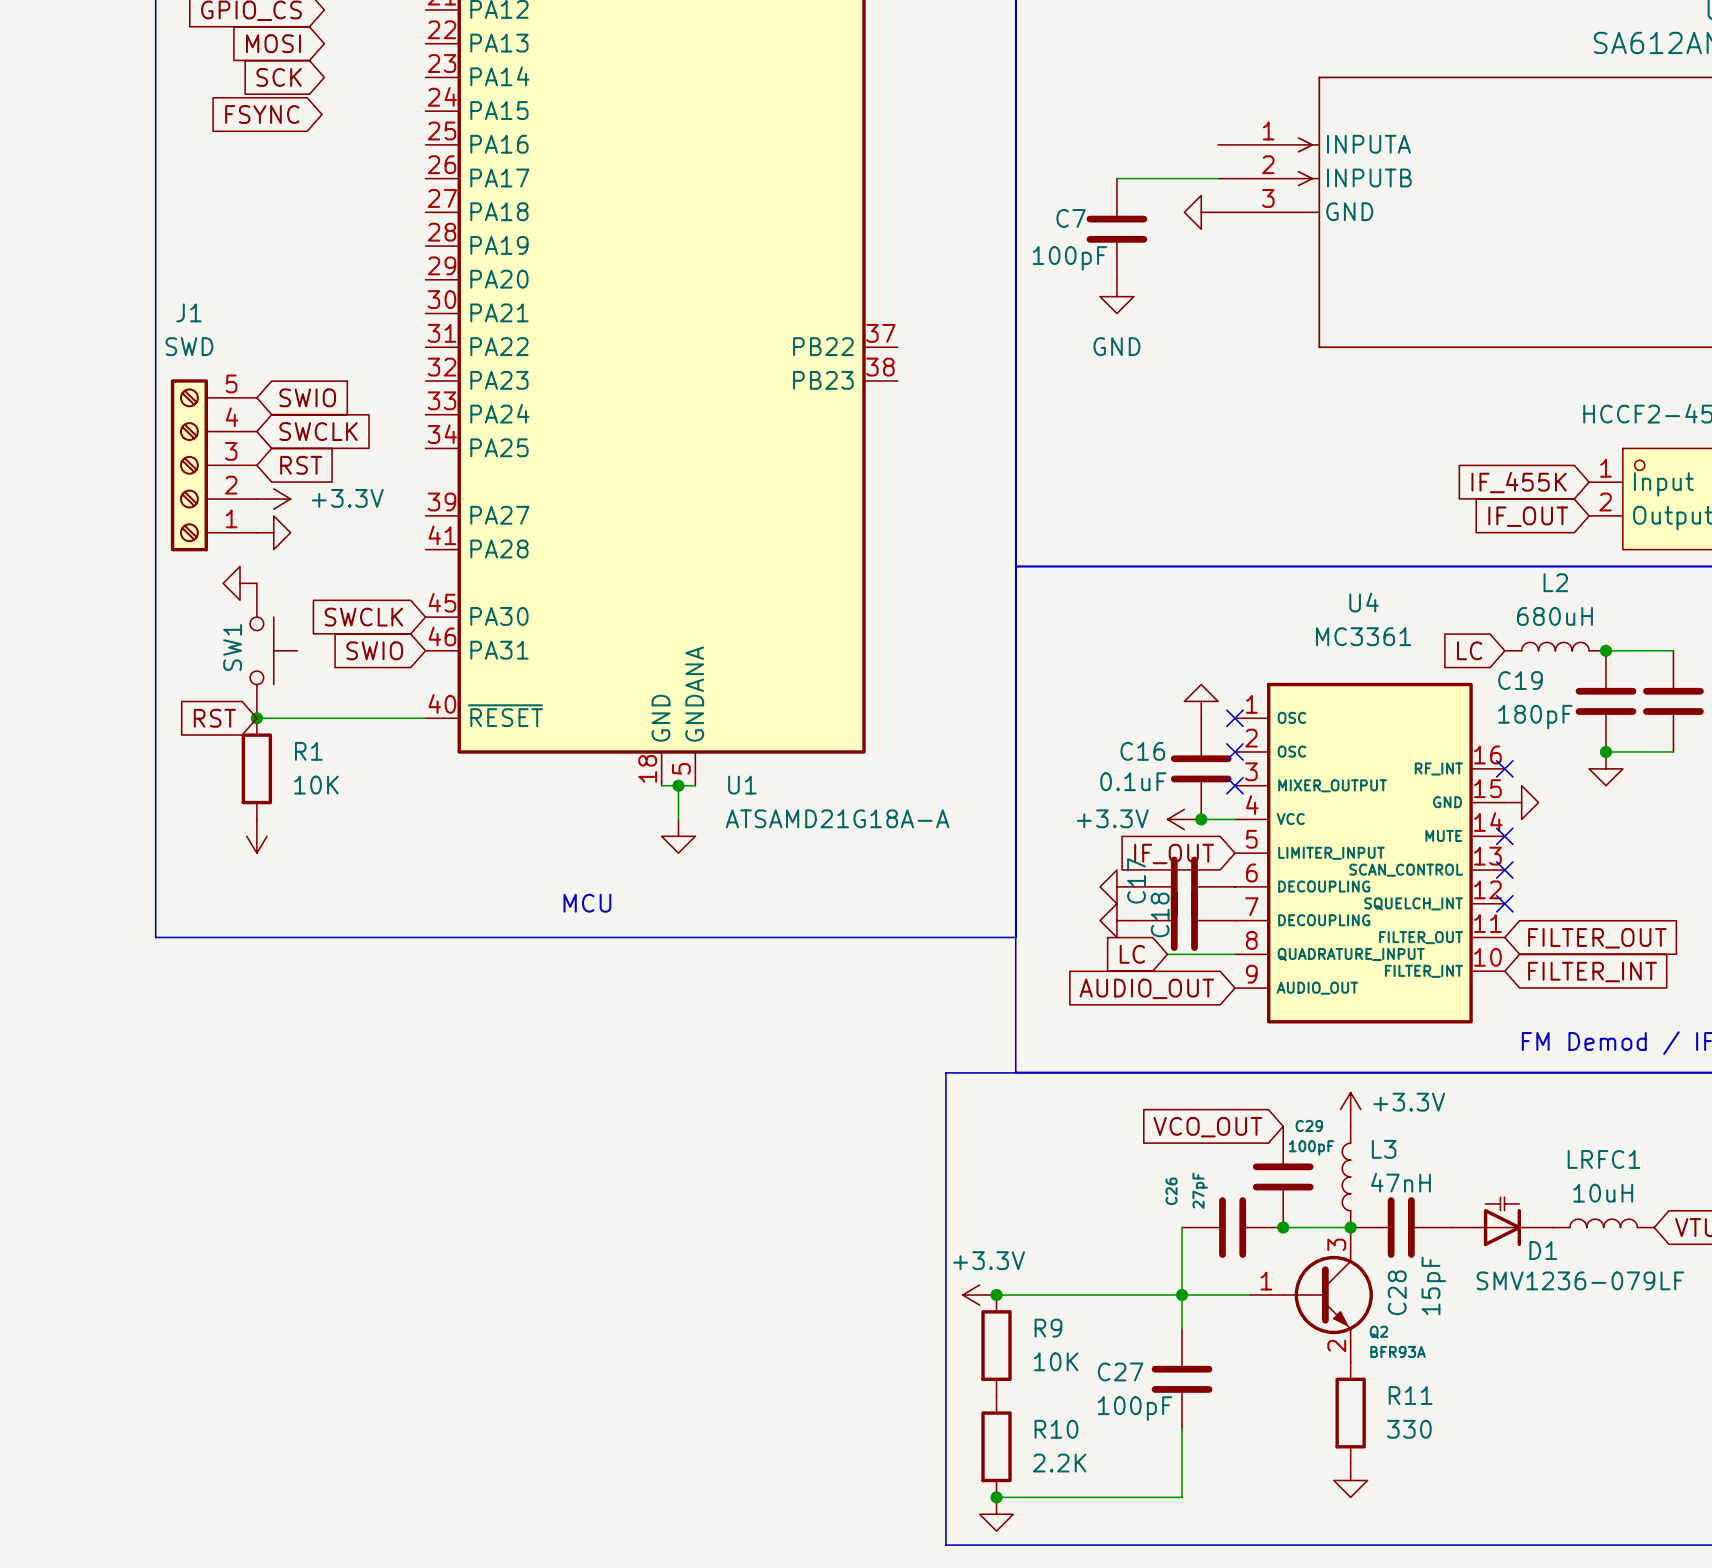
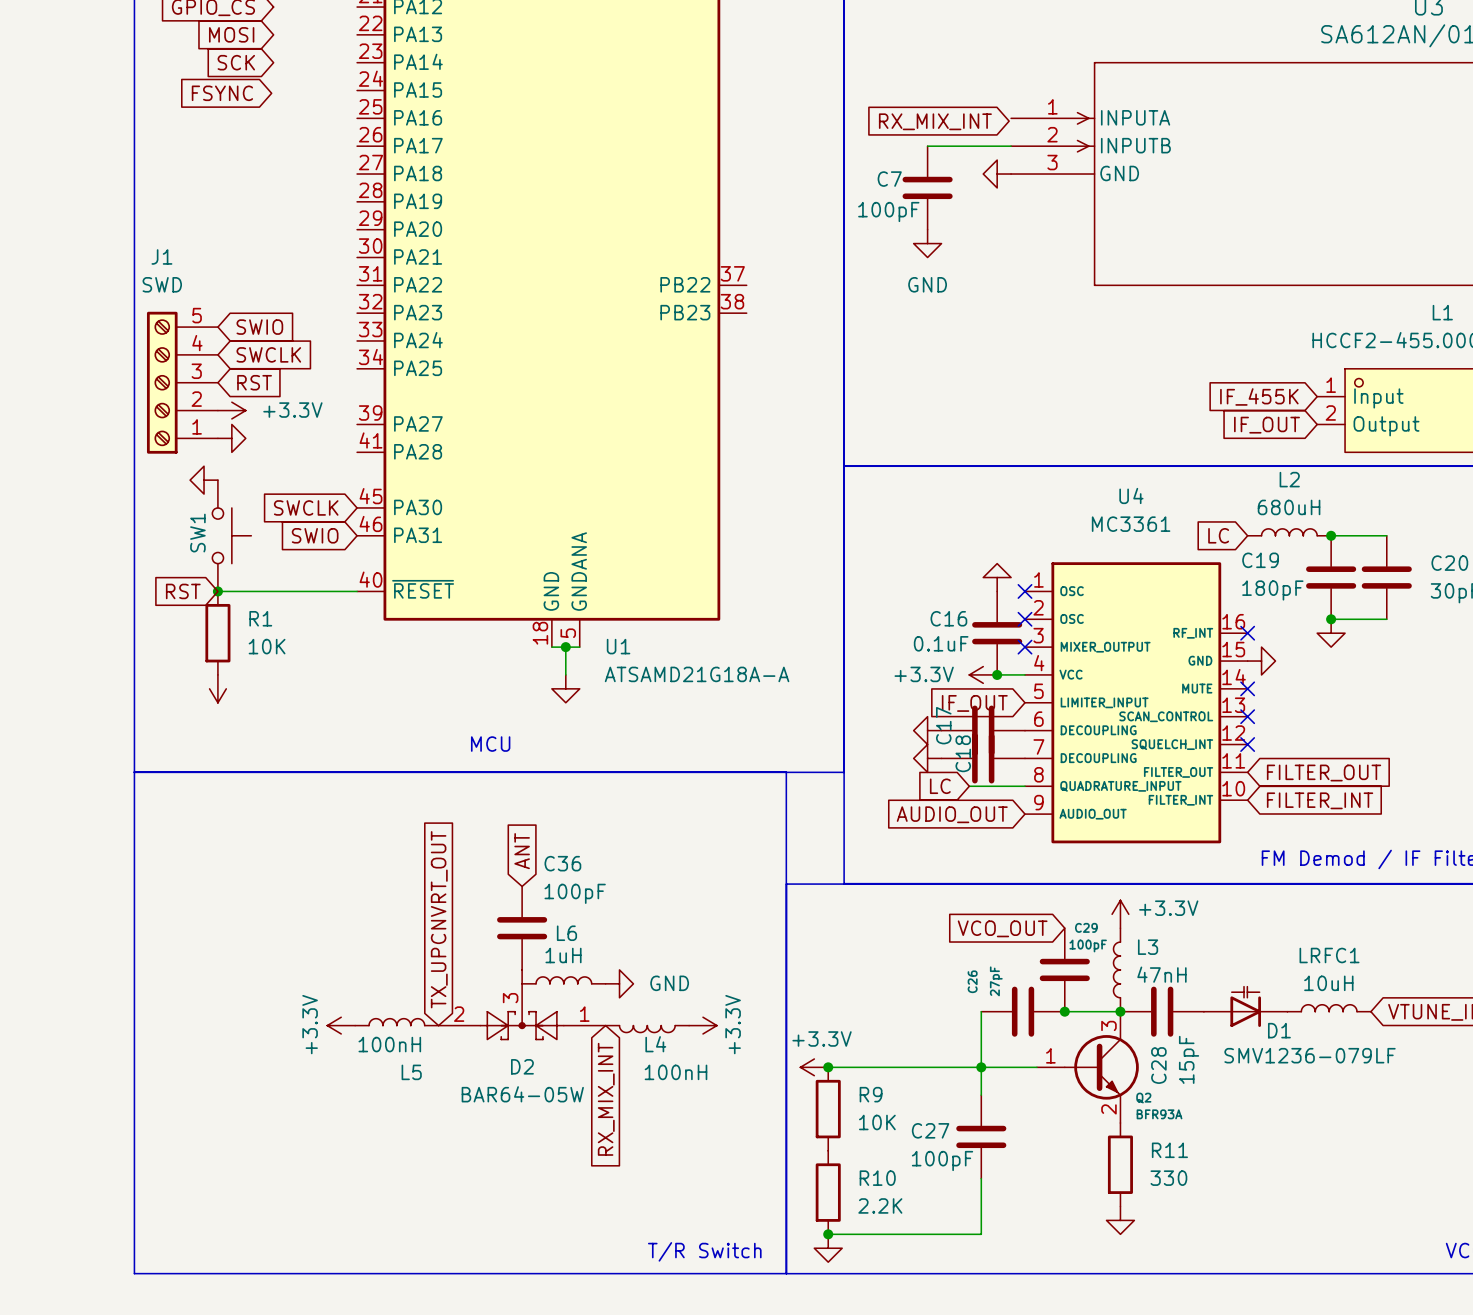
global label: none -> RX_MIX_INT (935, 121)
line: none -> (134, 772) (786, 772) (786, 1273) (134, 1273) (134, 772)
global label: none -> ANT (522, 851)
global label: none -> TX_UPCNVRT_OUT (439, 919)
C36: none -> 100pF (522, 928)
L6: none -> 1uH (563, 980)
power symbol: none -> GND (619, 983)
D2: none -> BAR64-05W (522, 1004)
L5: none -> 100nH (396, 1022)
power symbol: none -> +3.3V (341, 1025)
power symbol: none -> +3.3V (703, 1025)
L4: none -> 100nH (647, 1029)
global label: none -> RX_MIX_INT (606, 1099)
text: none -> T/R Switch (704, 1251)

